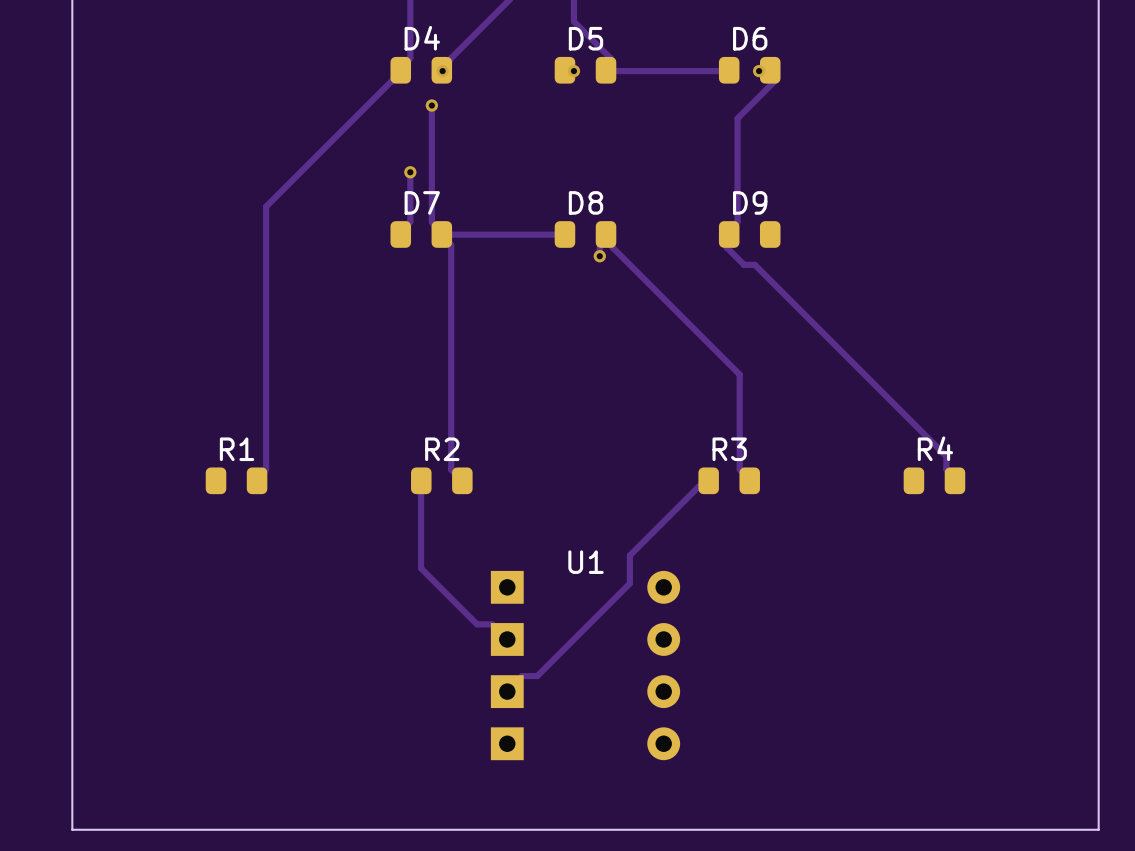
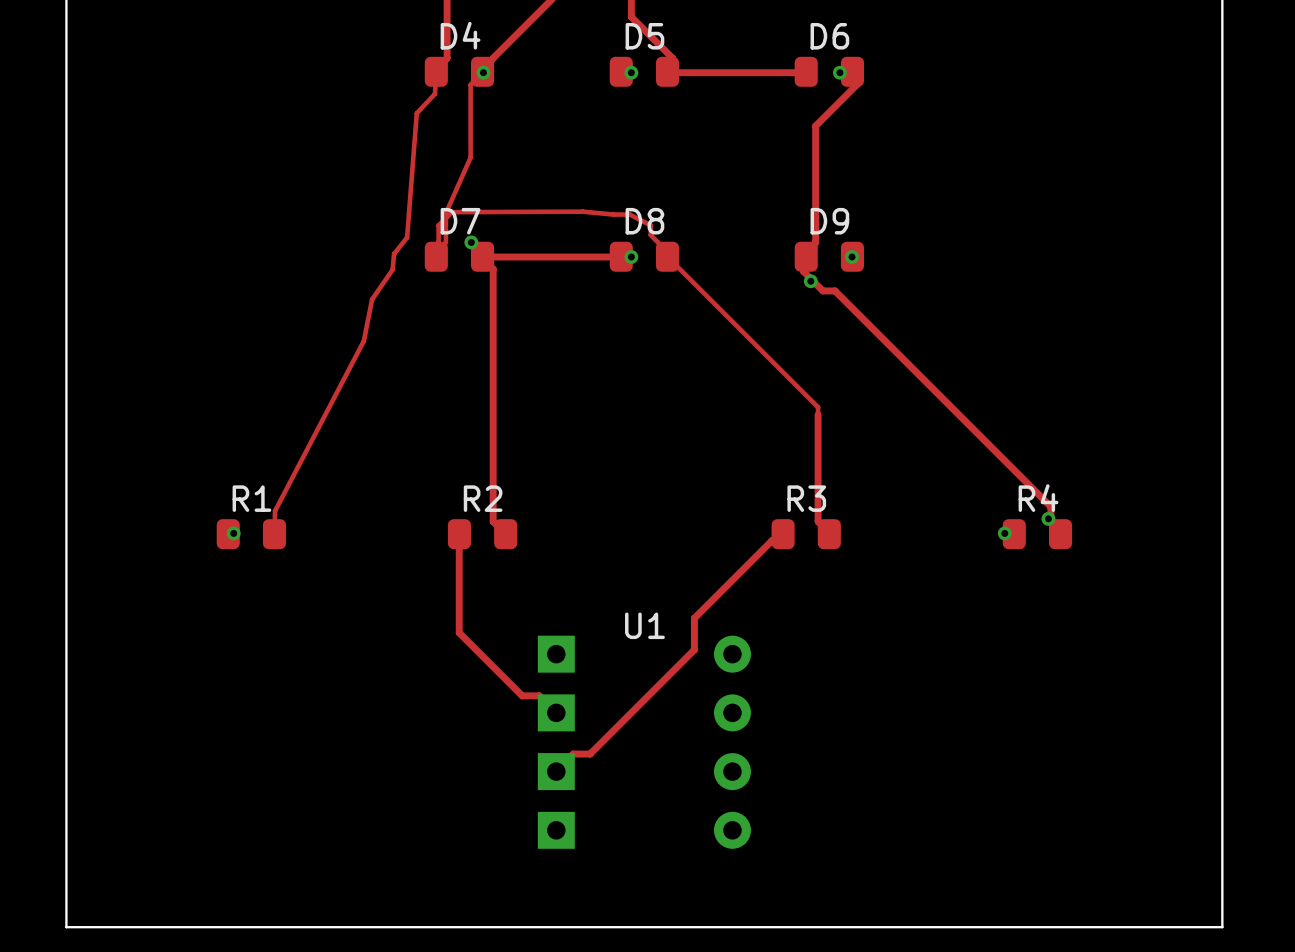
track: (400, 70) (266, 206) (266, 469) (257, 480) -> (436, 71) (434, 93) (416, 113) (407, 237) (394, 254) (392, 269) (372, 299) (363, 341) (275, 511) (274, 534)
track: (431, 105) (431, 221) -> none
via: (431, 105) -> none
track: (410, 172) (410, 221) (400, 234) -> none
via position: (410, 172) -> (471, 242)
via: none -> (852, 256)
track: (599, 256) (599, 247) (606, 234) (612, 247) (739, 374) -> (482, 71) (470, 84) (470, 157) (445, 213) (445, 242) (436, 256) (438, 225) (451, 212) (582, 211) (629, 214) (650, 225) (650, 235) (667, 256) (818, 407) (818, 414)
via position: (599, 256) -> (631, 256)
via: none -> (810, 281)
via: none -> (1048, 518)
via: none -> (233, 533)
via: none -> (1004, 533)

